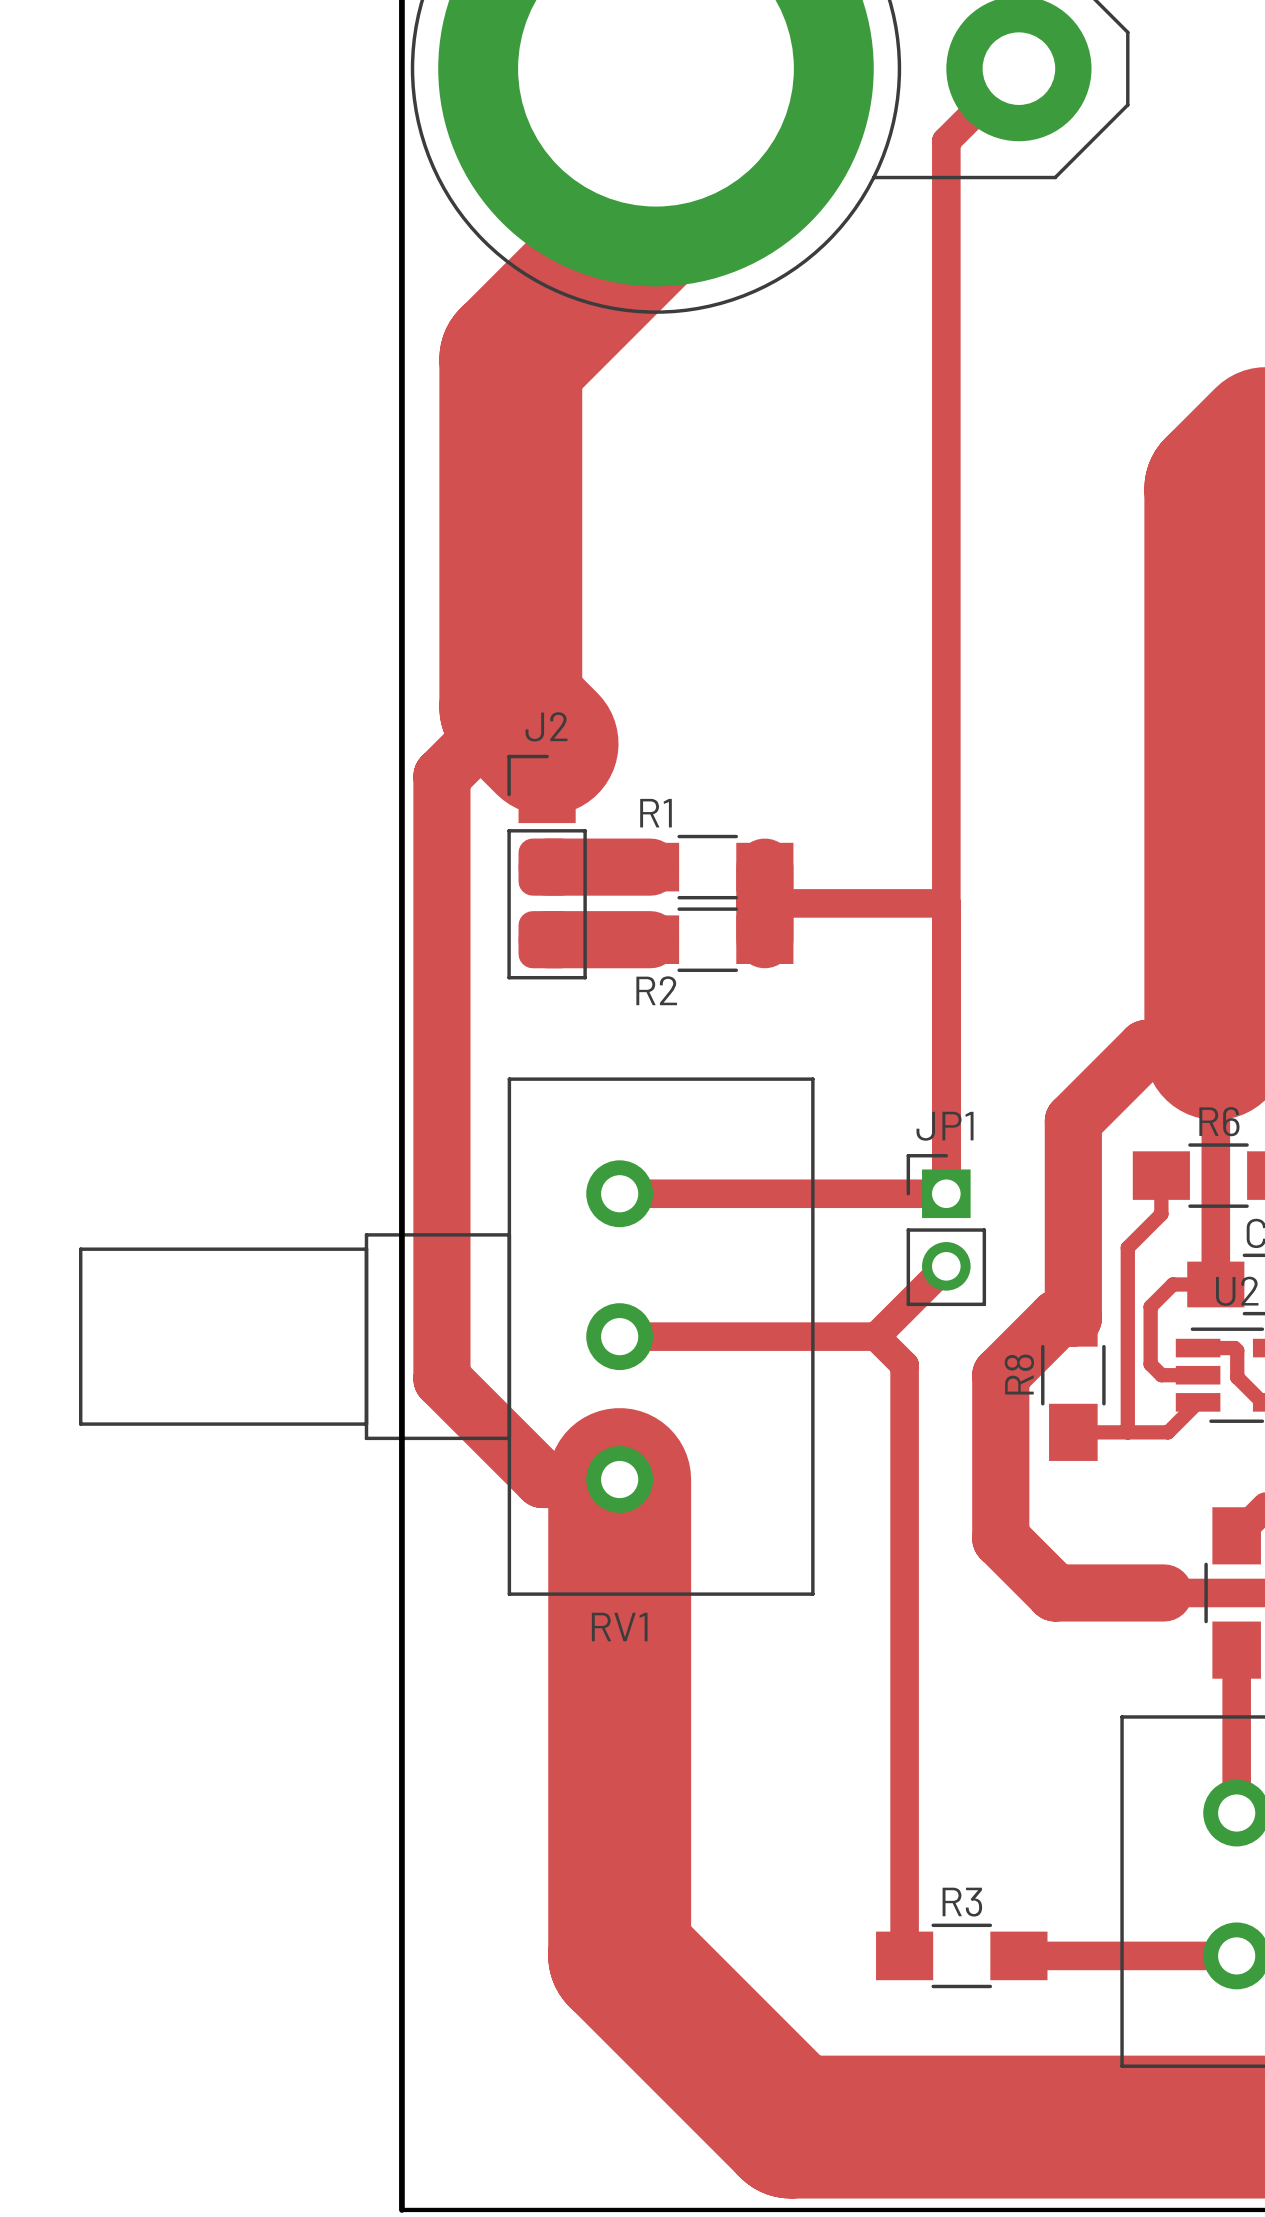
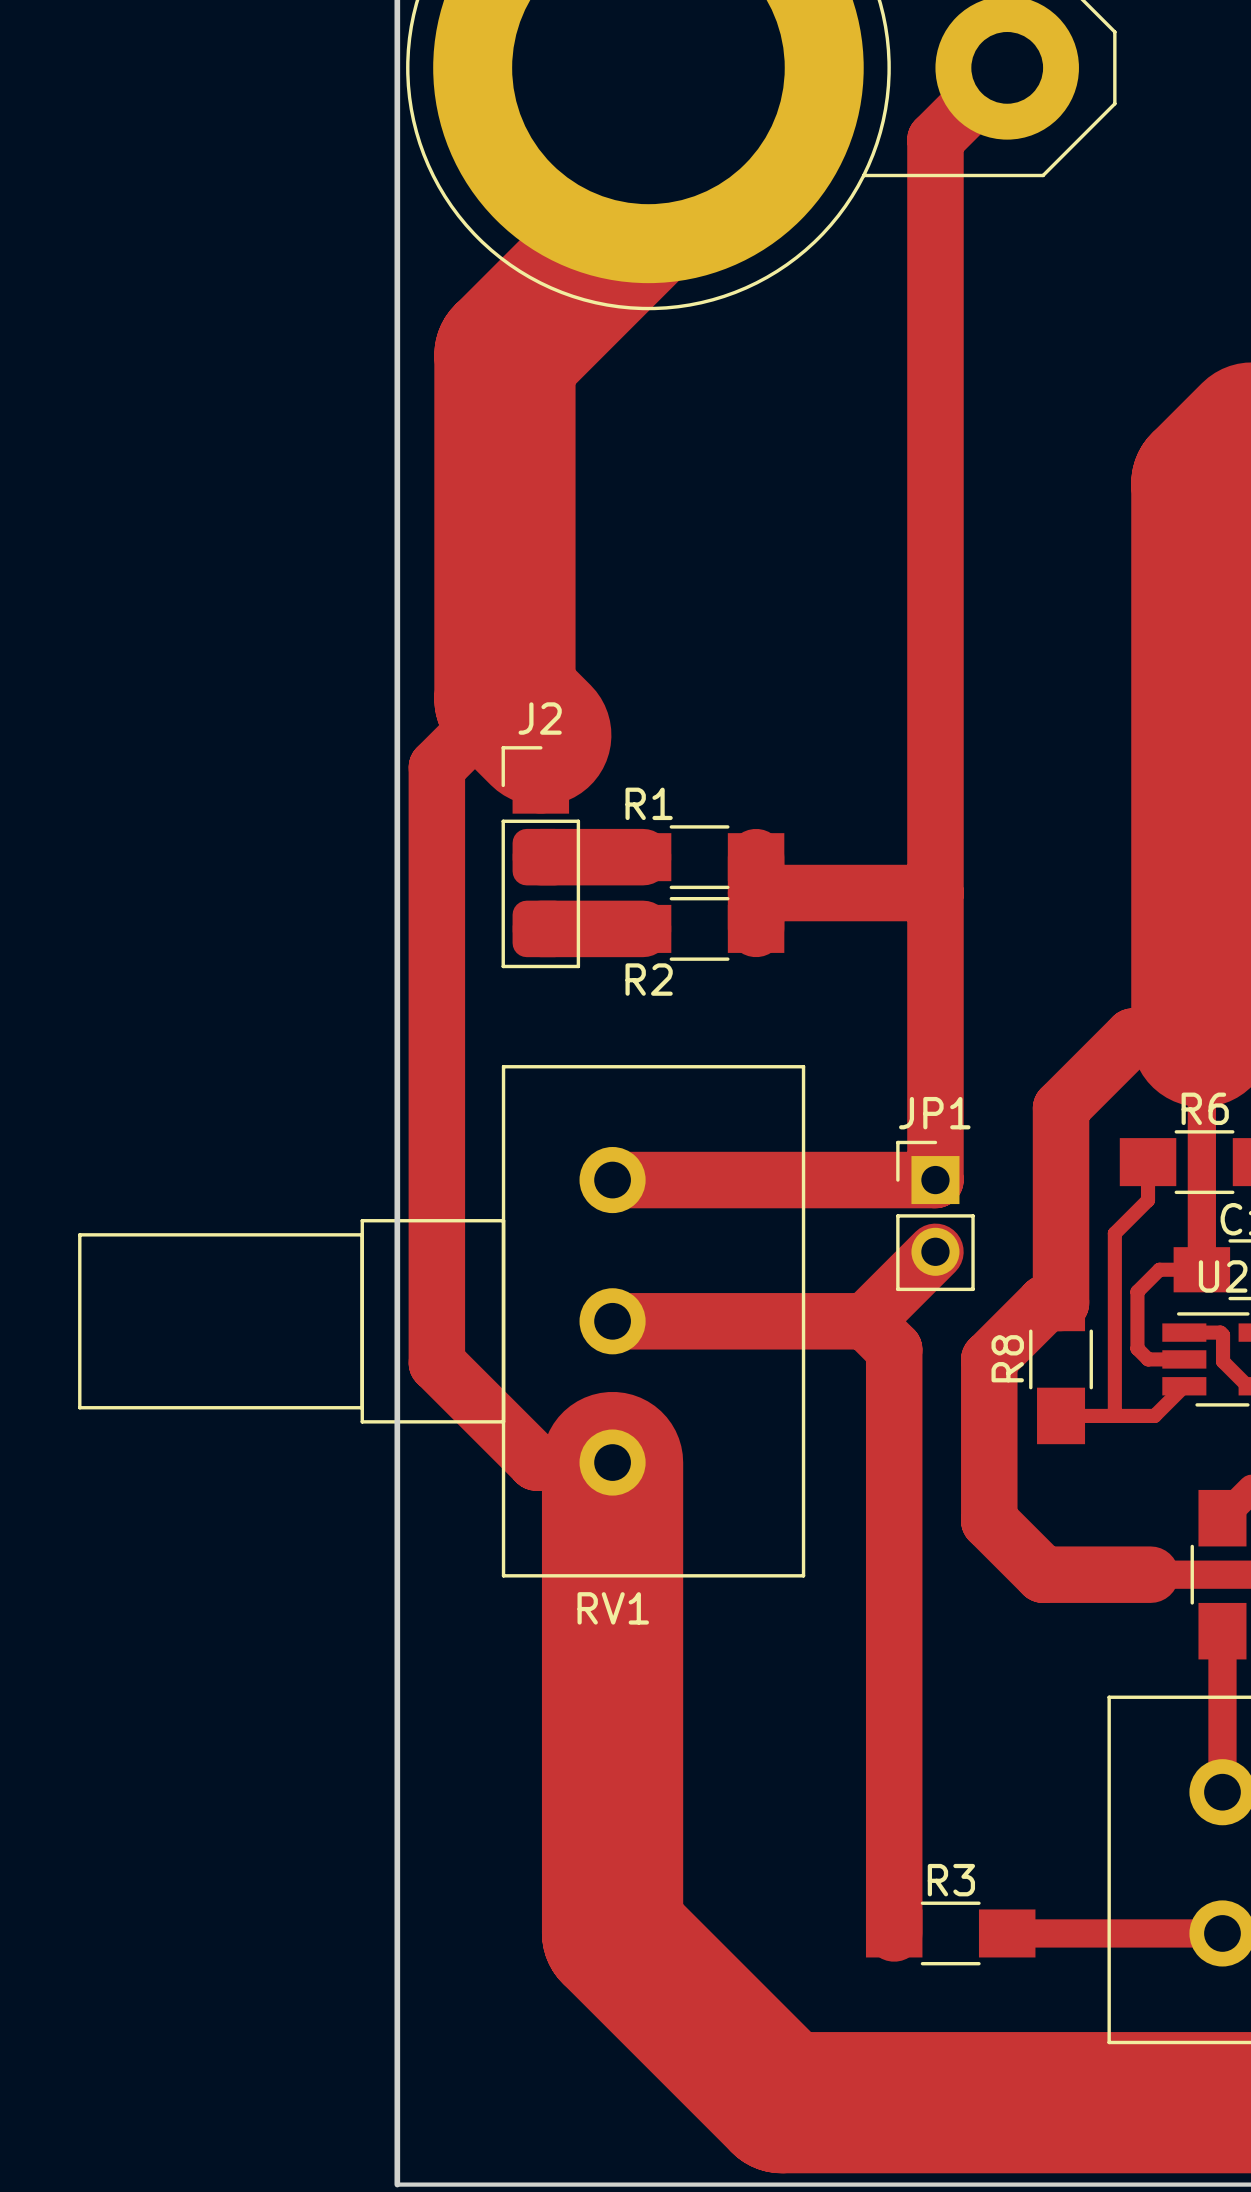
track width: thin (1018, 68) (946, 141) (946, 1193) (619, 1193) -> thick (1007, 67) (935, 139) (935, 1180) (612, 1180)
track width: thin (764, 903) (946, 903) -> thick (756, 893) (935, 893)
track width: thin (946, 1266) (876, 1336) -> thick (935, 1251) (865, 1321)
track width: thin (619, 1336) (876, 1336) -> thick (612, 1321) (865, 1321)
track width: thin (876, 1336) (904, 1365) (904, 1955) -> thick (865, 1321) (894, 1349) (894, 1933)

